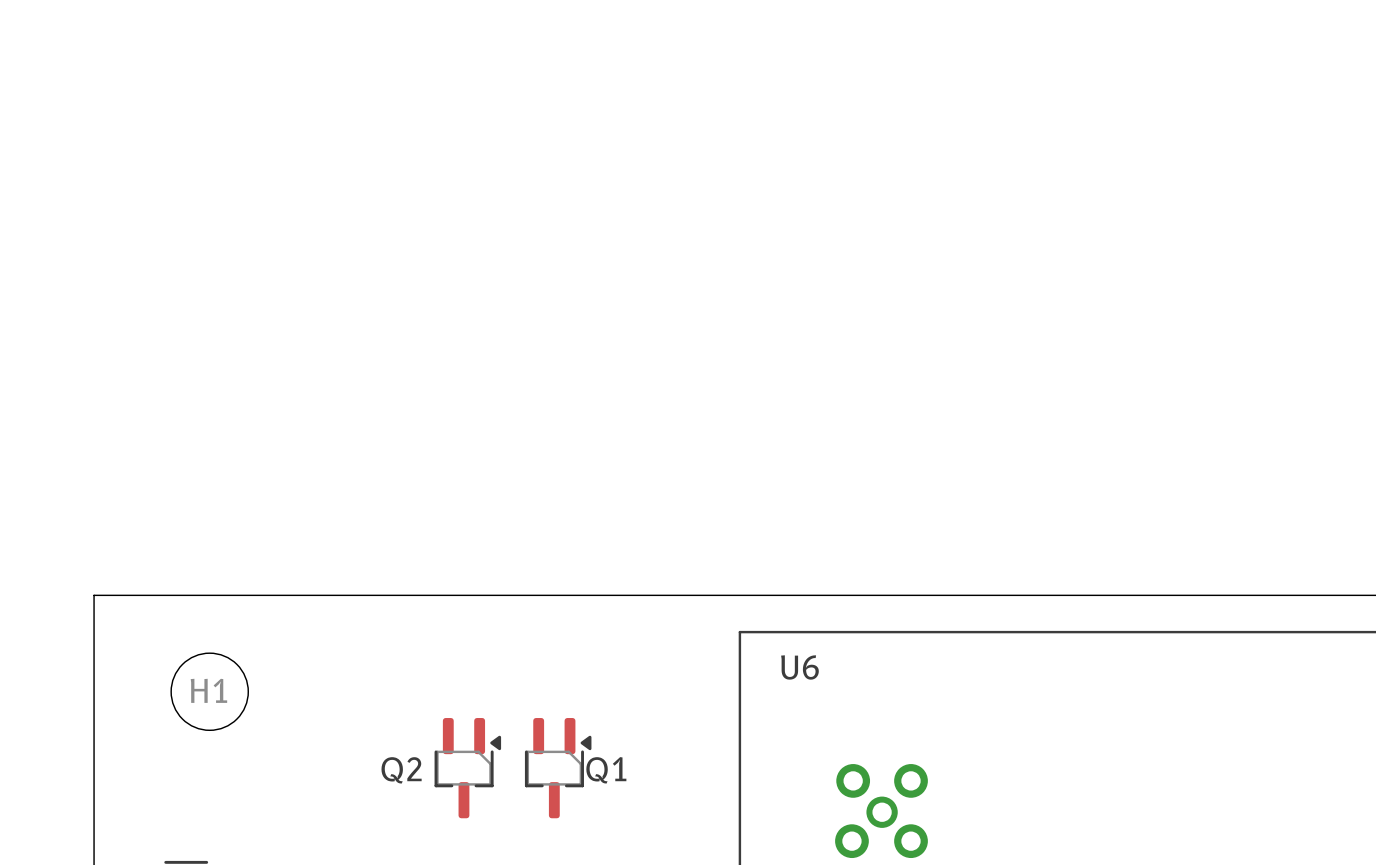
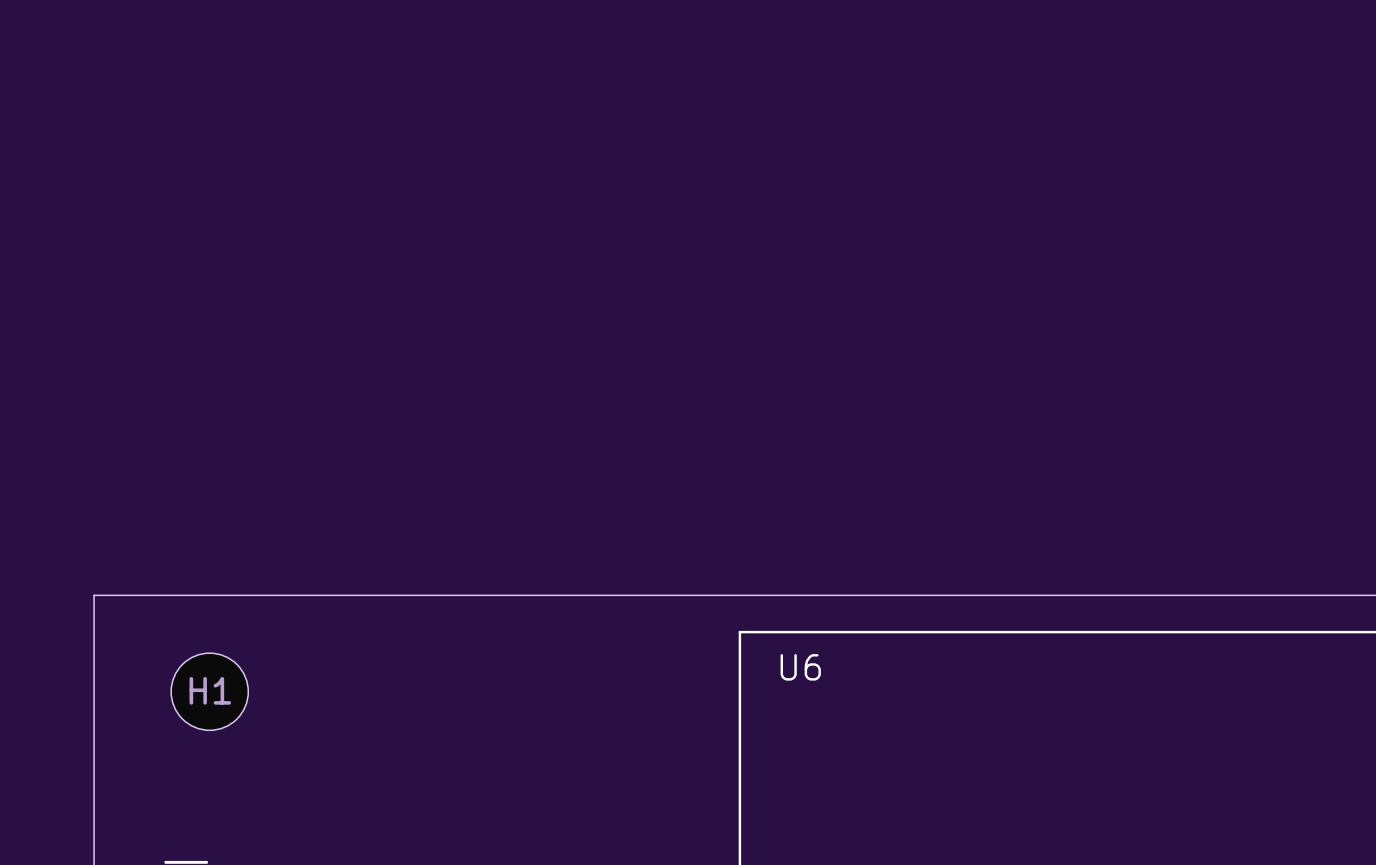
Q2: (467, 768) -> none
Q1: (558, 768) -> none
part: (881, 811) -> none

